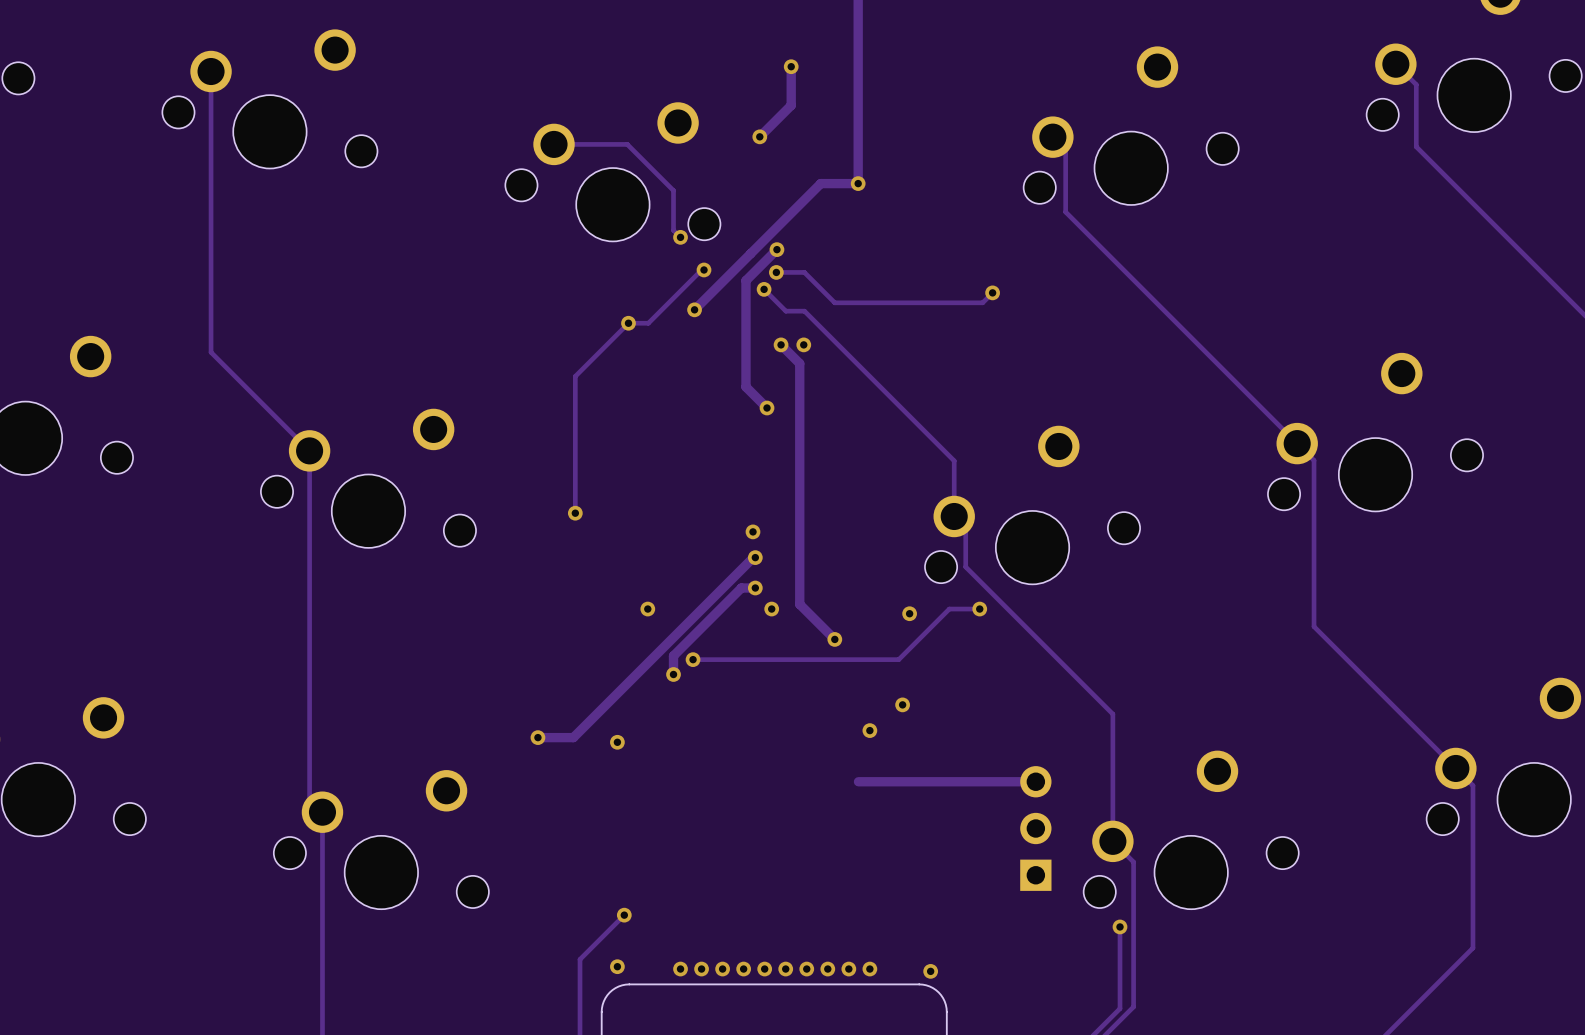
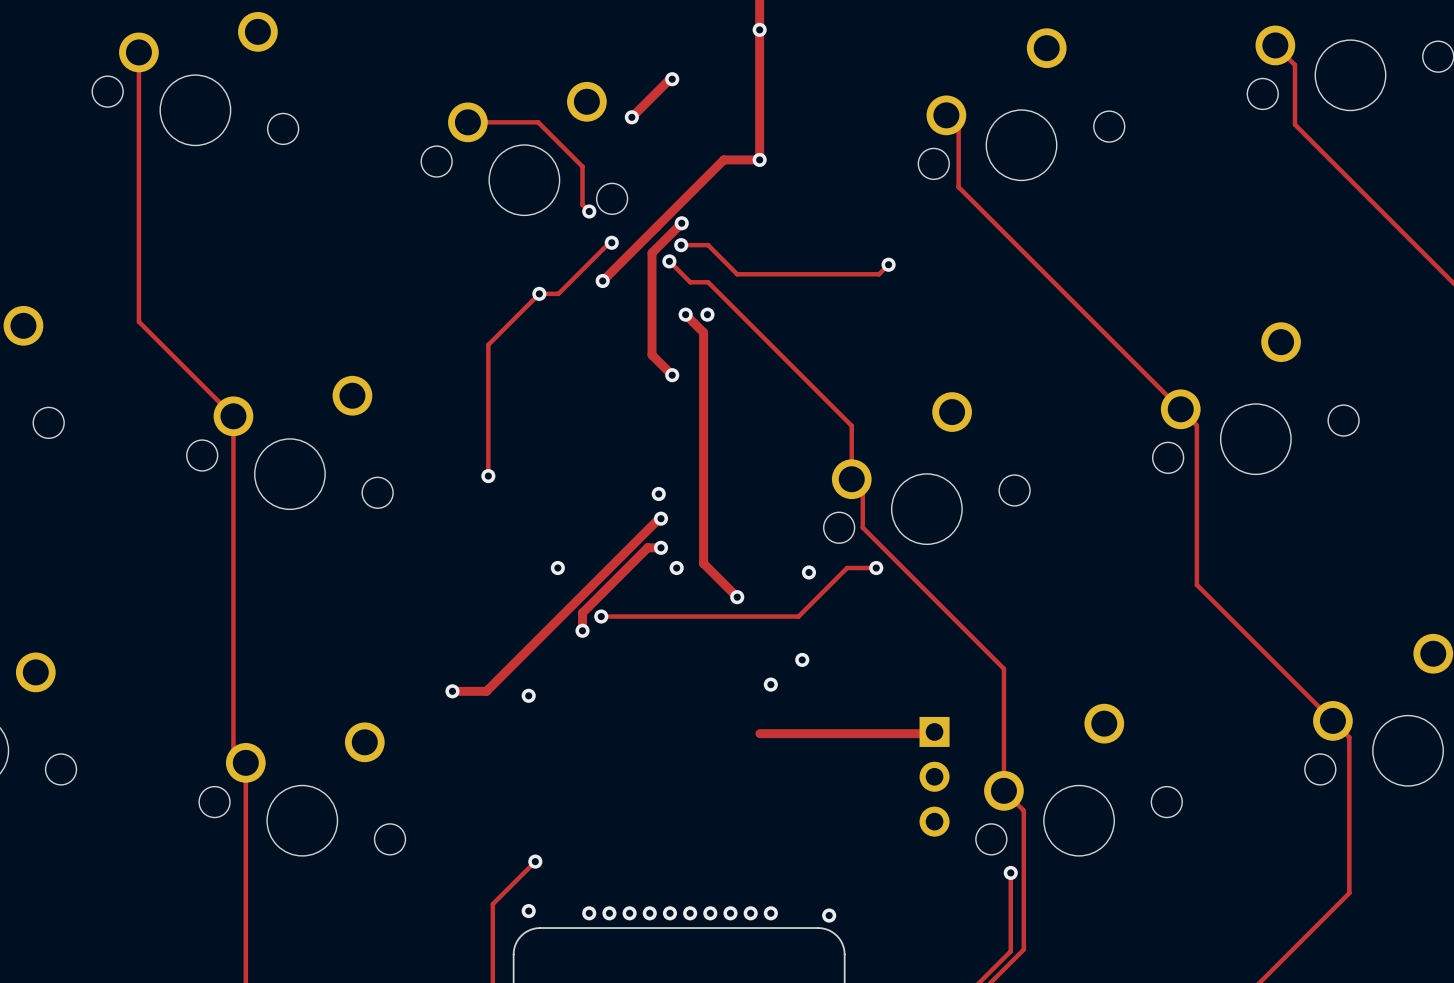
via: none -> (759, 29)
track: (791, 66) (791, 105) (759, 136) -> none
via: (791, 66) -> none
track: none -> (672, 79) (669, 79) (631, 117)
via: none -> (672, 79)
via: (759, 136) -> none
via: none -> (631, 117)
part rotation: 0° (1035, 828) -> 180° (934, 776)

